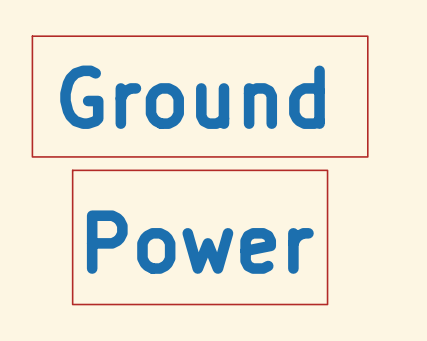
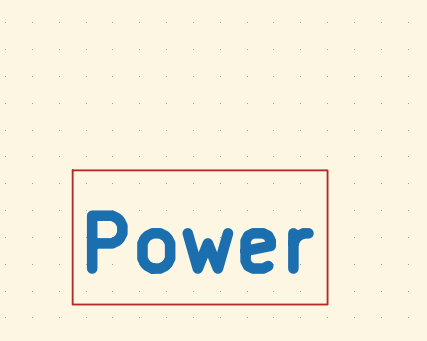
sheet Ground: (200, 96) -> none

